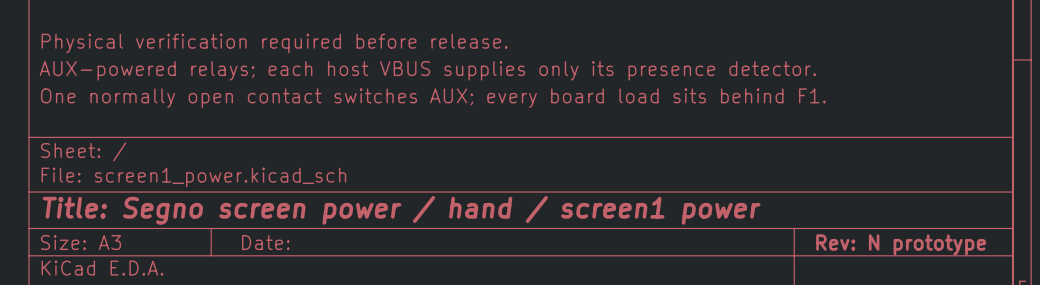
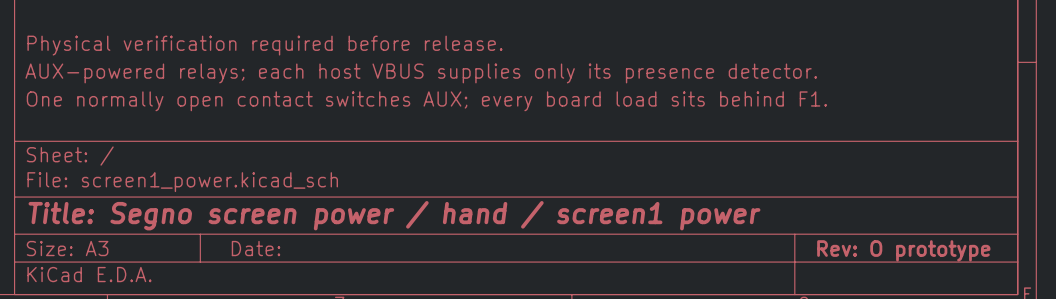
title block: Rev: N prototype (901, 244) -> Rev: O prototype (903, 250)

